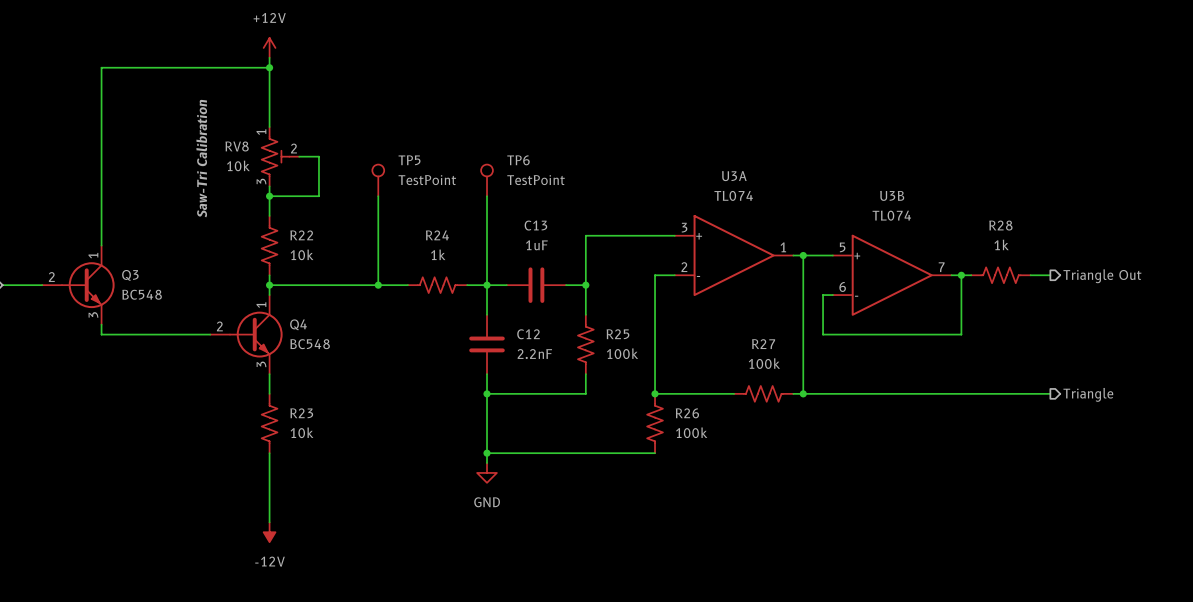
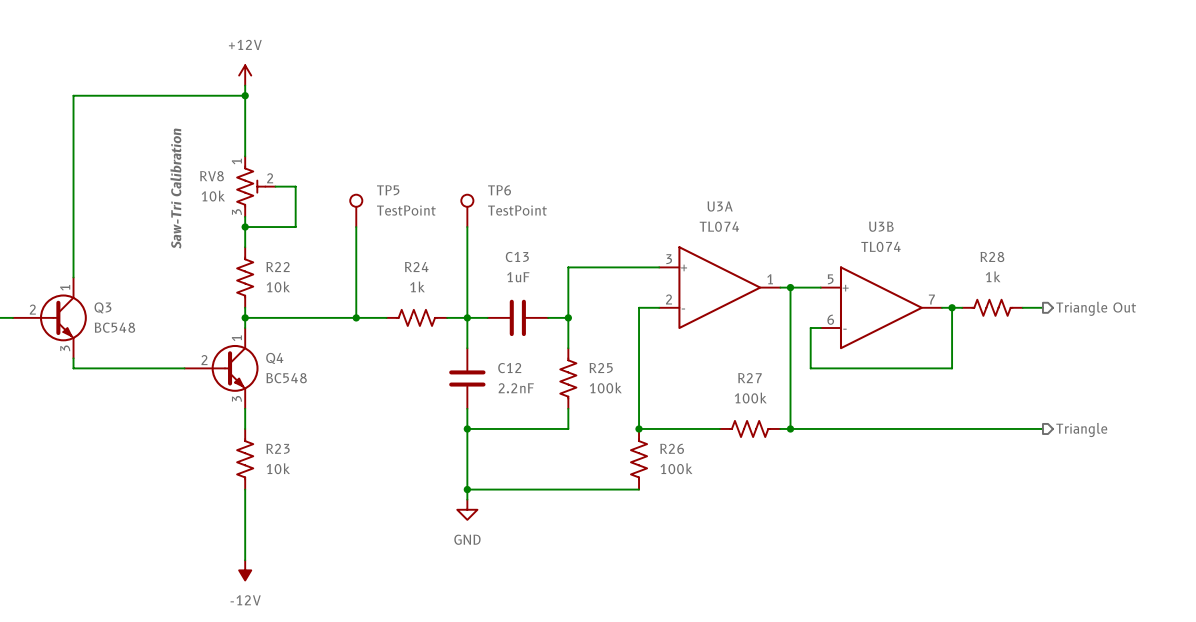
Q3 symbol: [42, 245, 115, 325] -> [12, 277, 87, 359]
Q4 symbol: [210, 295, 283, 375] -> [184, 328, 259, 409]

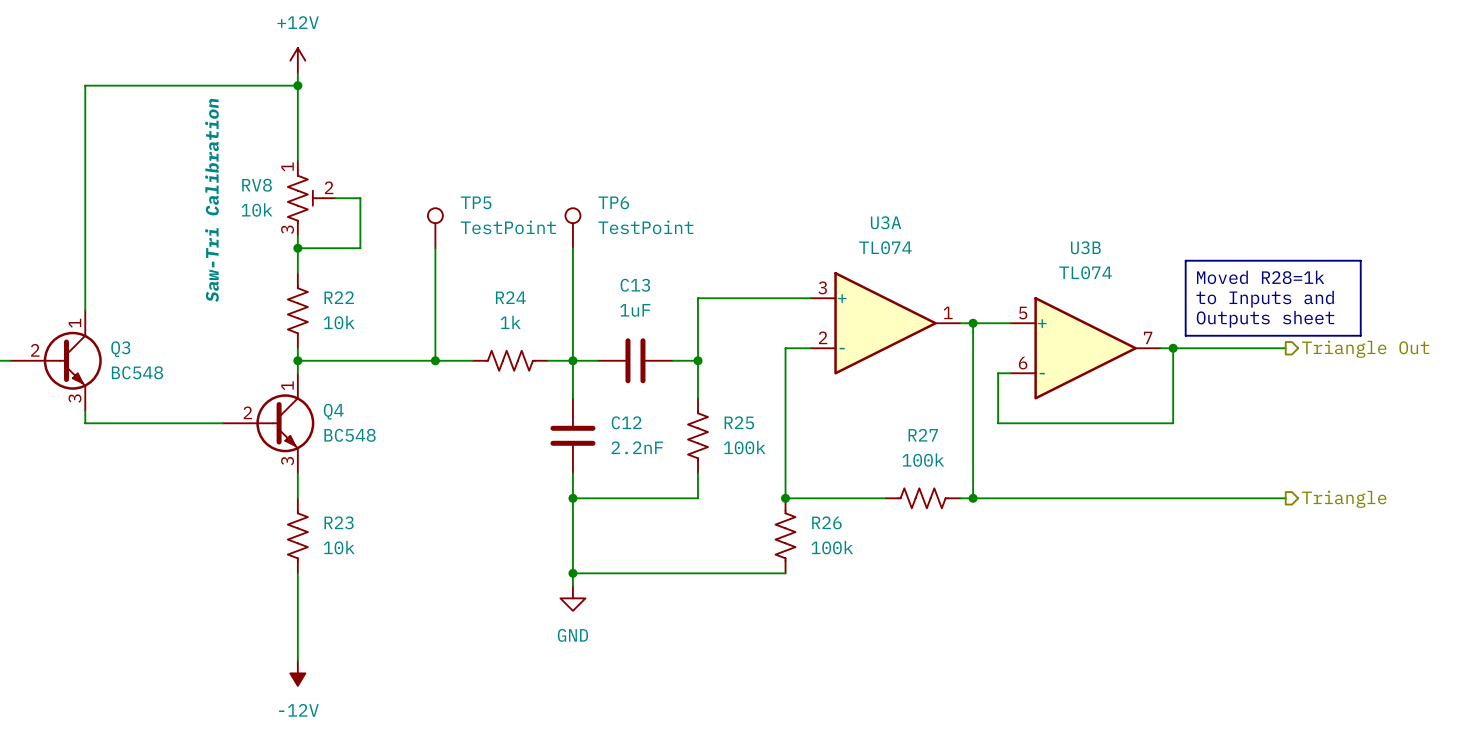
line: none -> (1185, 260) (1360, 260) (1360, 335) (1185, 335) (1185, 260)
text: none -> Moved R28=1k (1260, 277)
text: none -> to Inputs and (1265, 299)
text: none -> Outputs sheet (1265, 319)
R28: 1k (992, 307) -> none

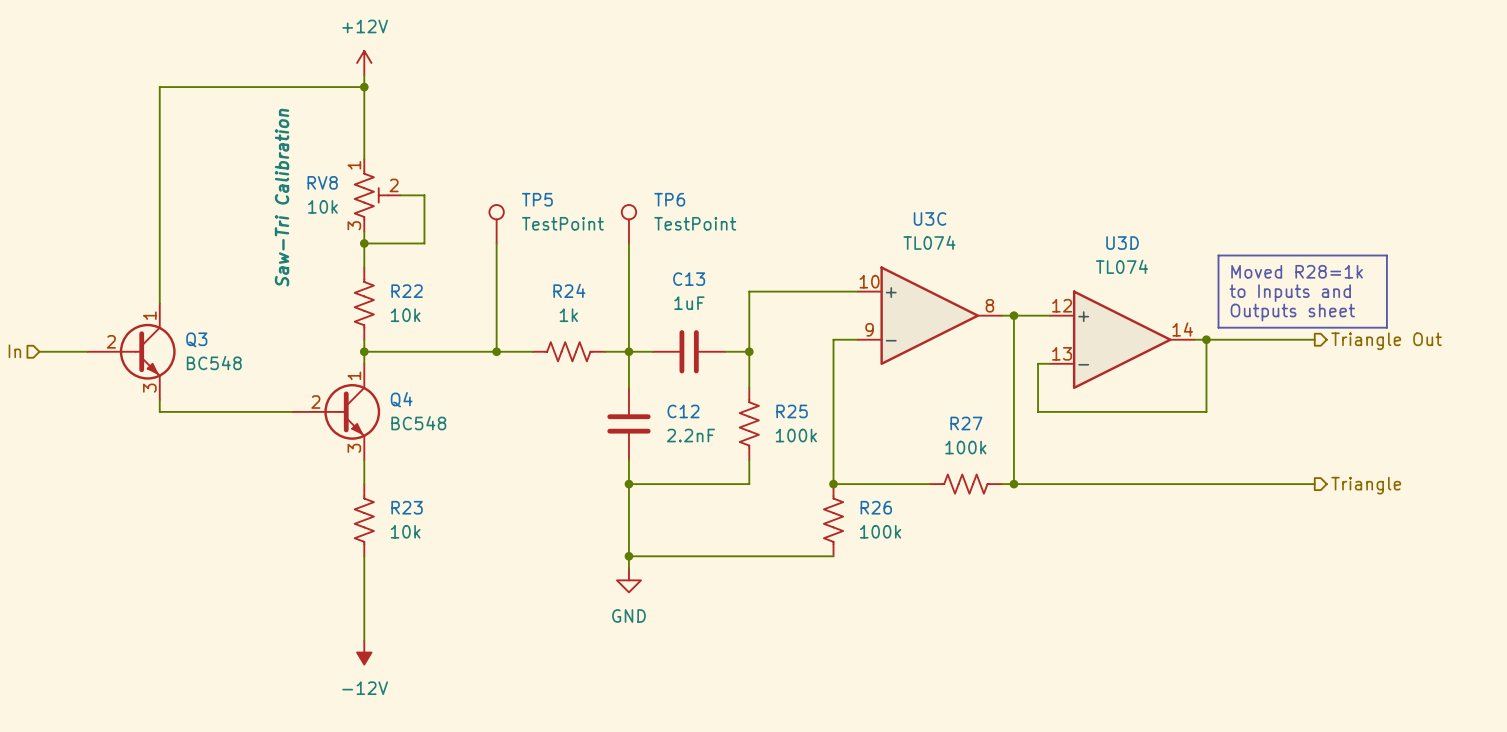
U3A name: U3A (886, 222) -> U3C (930, 218)
U3B name: U3B (1085, 247) -> U3D (1122, 243)
U3A pin number: 3 (822, 287) -> 10 (869, 281)
U3A pin number: 1 (948, 312) -> 8 (989, 305)
U3B pin number: 5 (1023, 313) -> 12 (1062, 305)
U3A pin number: 2 (823, 337) -> 9 (869, 329)
U3B pin number: 7 (1148, 337) -> 14 (1182, 329)
U3B pin number: 6 (1023, 363) -> 13 (1062, 353)

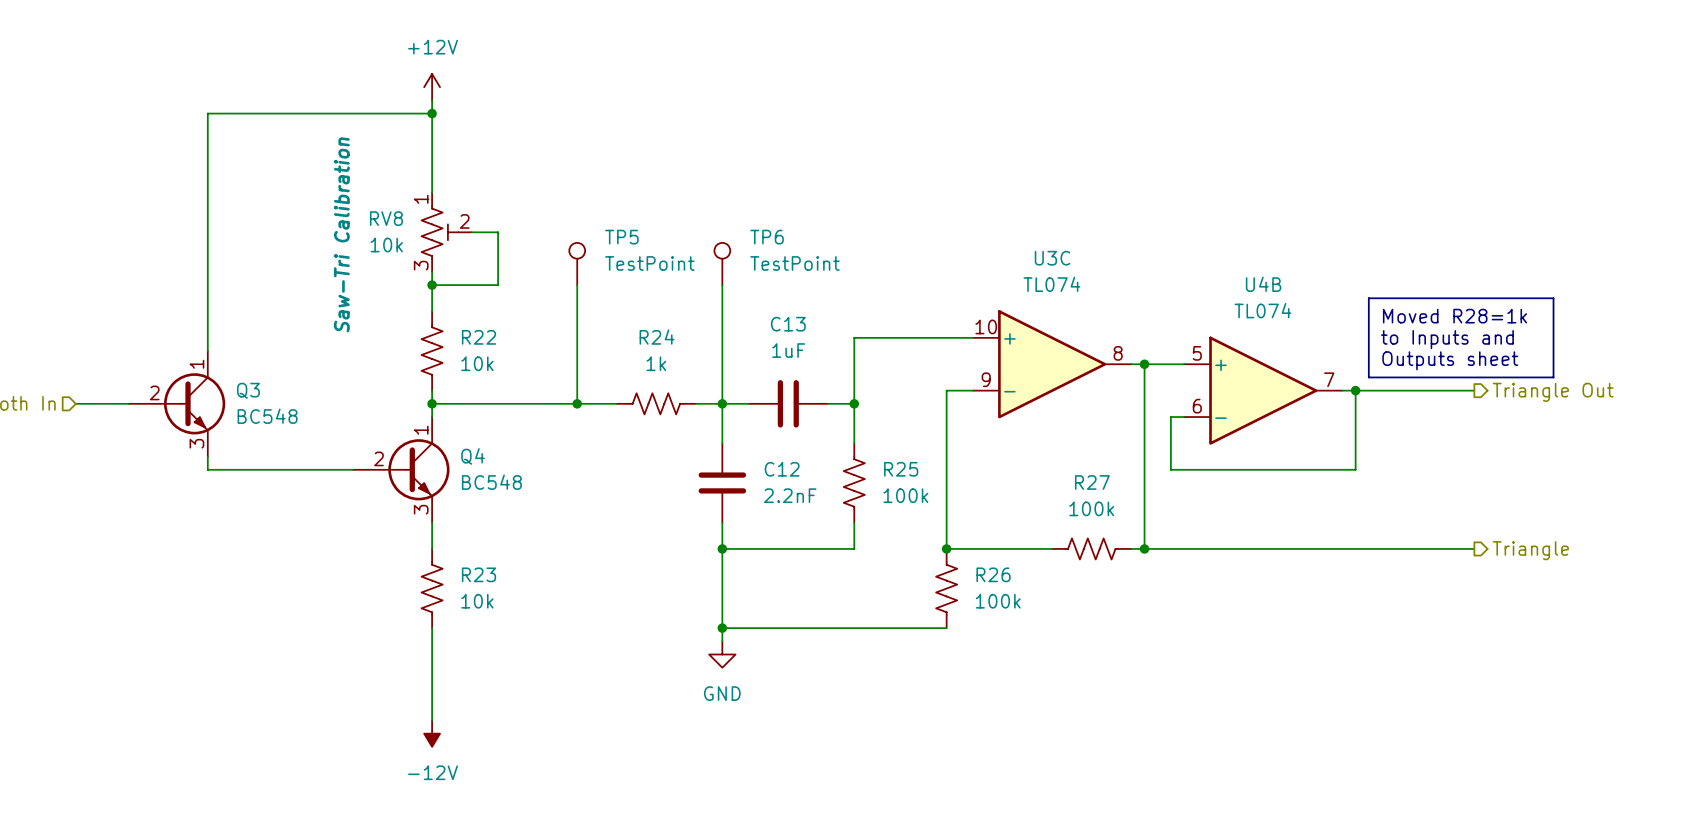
U3D name: U3D (1122, 243) -> U4B (1263, 284)
U3D pin number: 12 (1062, 305) -> 5 (1197, 353)
U3D pin number: 14 (1182, 329) -> 7 (1329, 379)
U3D pin number: 13 (1062, 353) -> 6 (1197, 406)

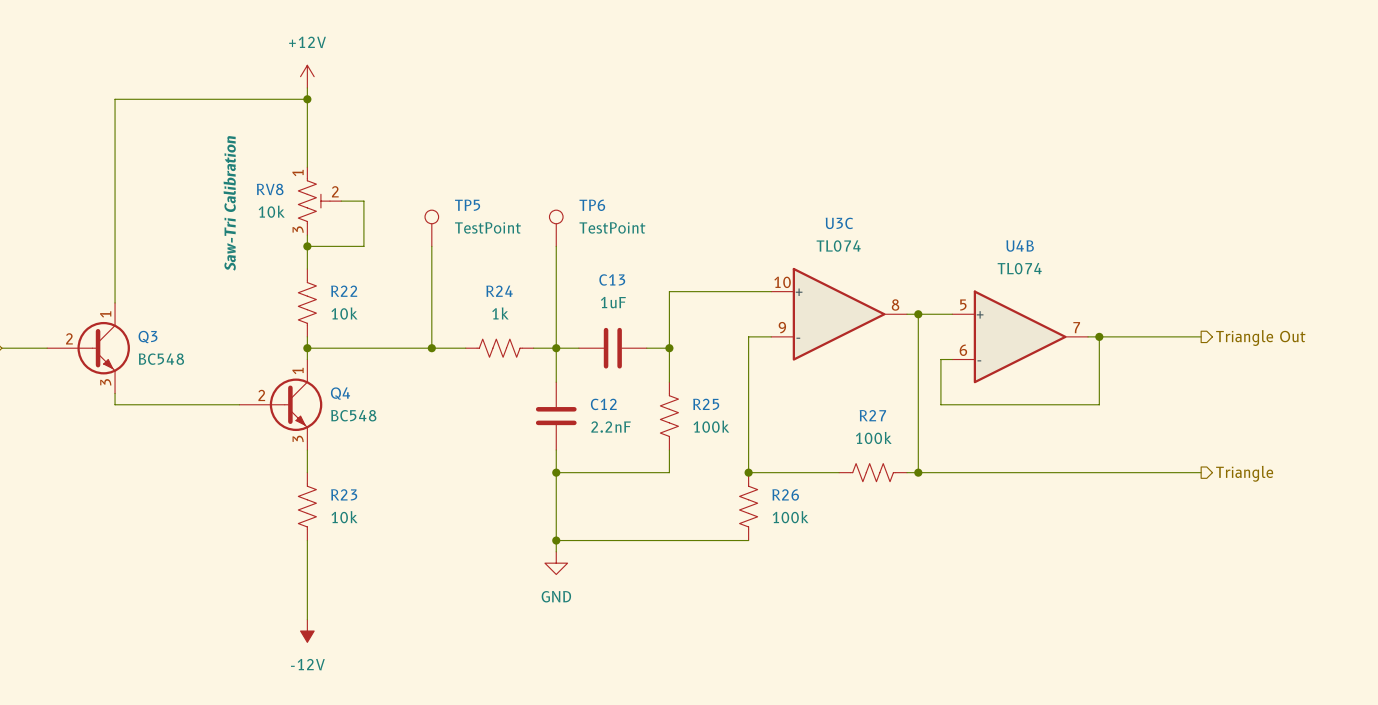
line: (1368, 298) (1553, 298) (1553, 377) (1368, 377) (1368, 298) -> none
text: Moved R28=1k (1454, 316) -> none
text: to Inputs and (1447, 339) -> none
text: Outputs sheet (1450, 360) -> none

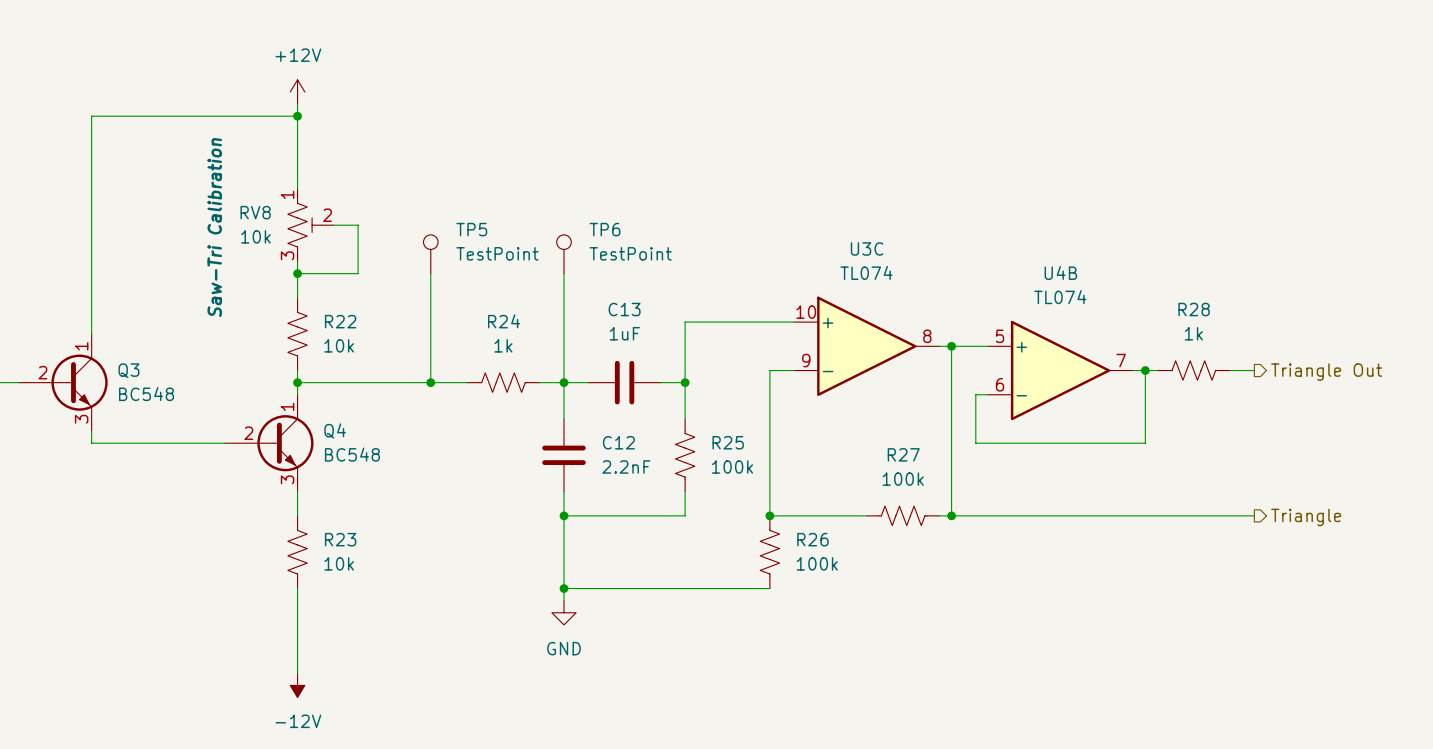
wire: (1110, 336) (1178, 336) -> none
R28: none -> 1k (1193, 370)

